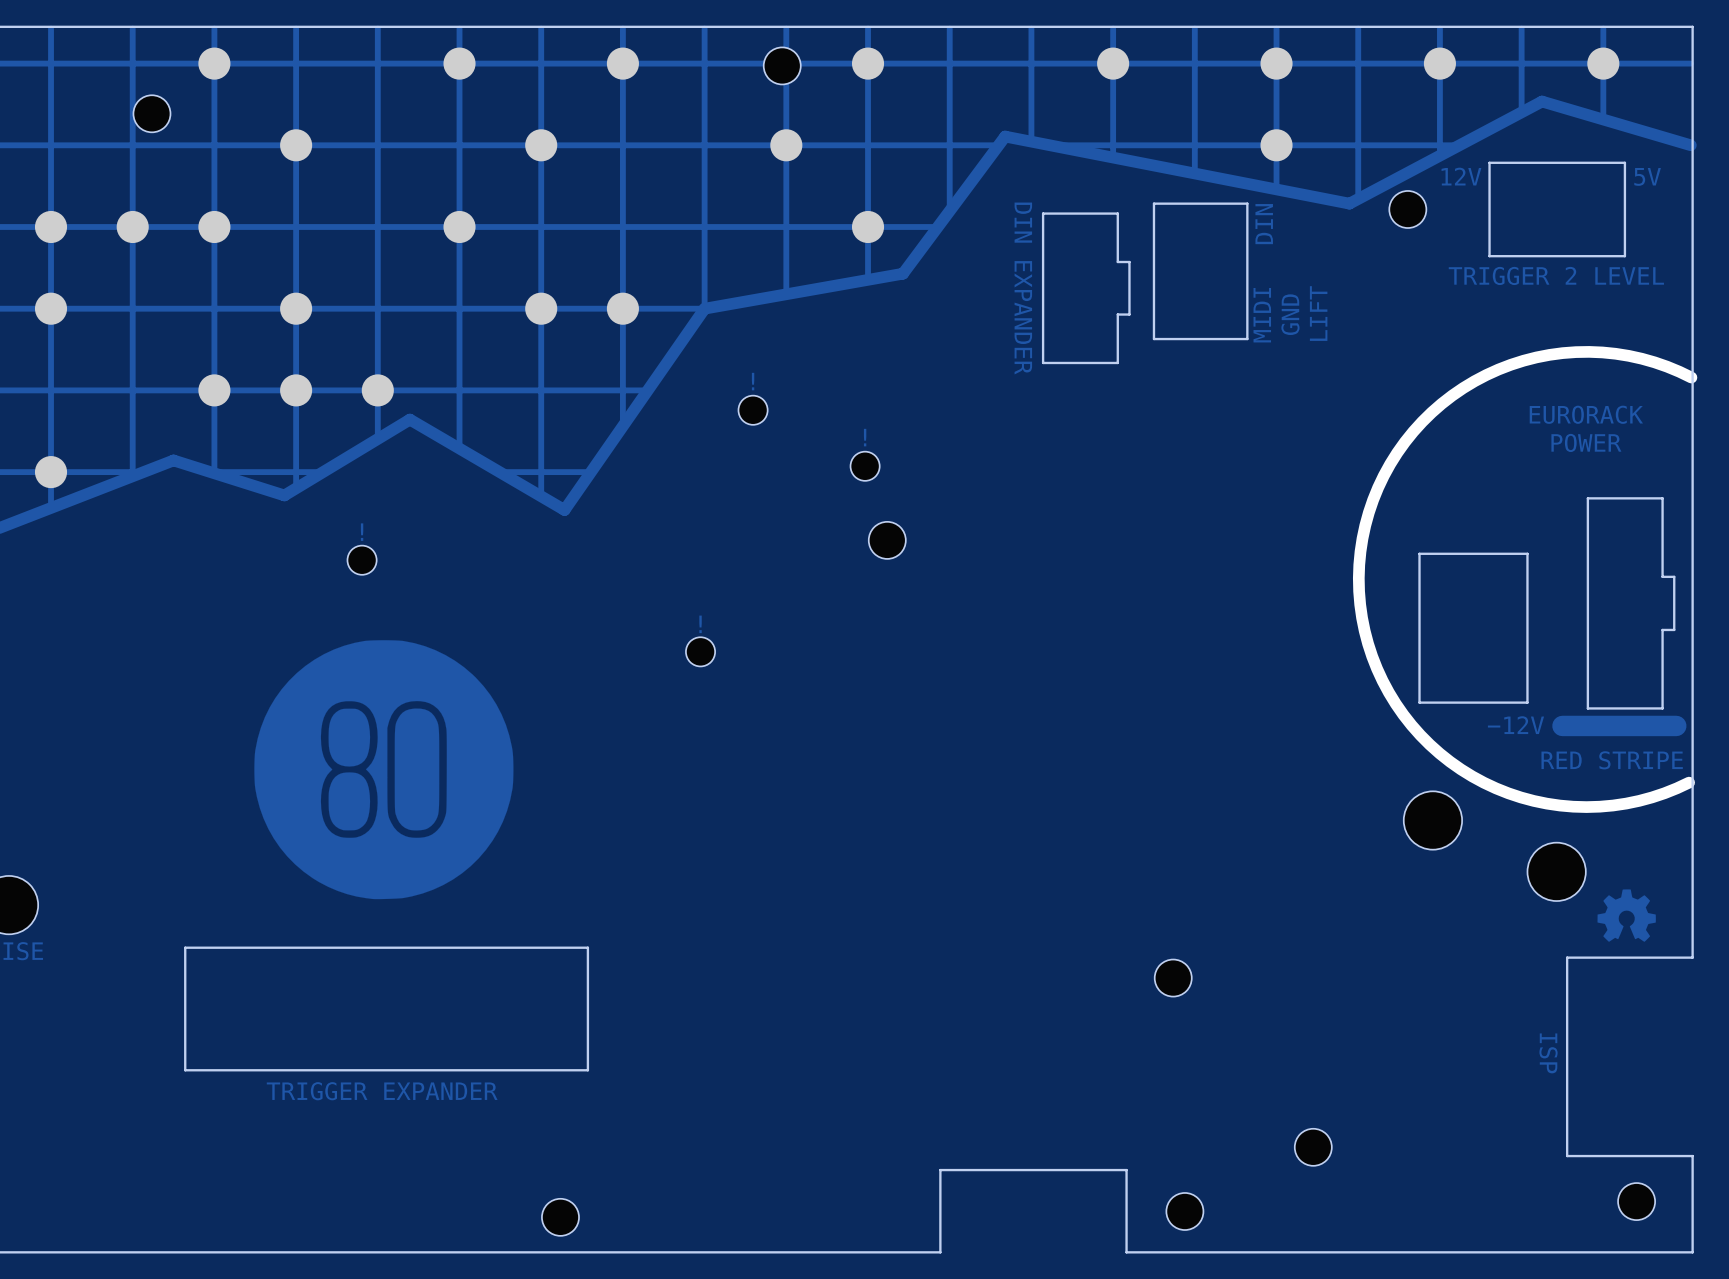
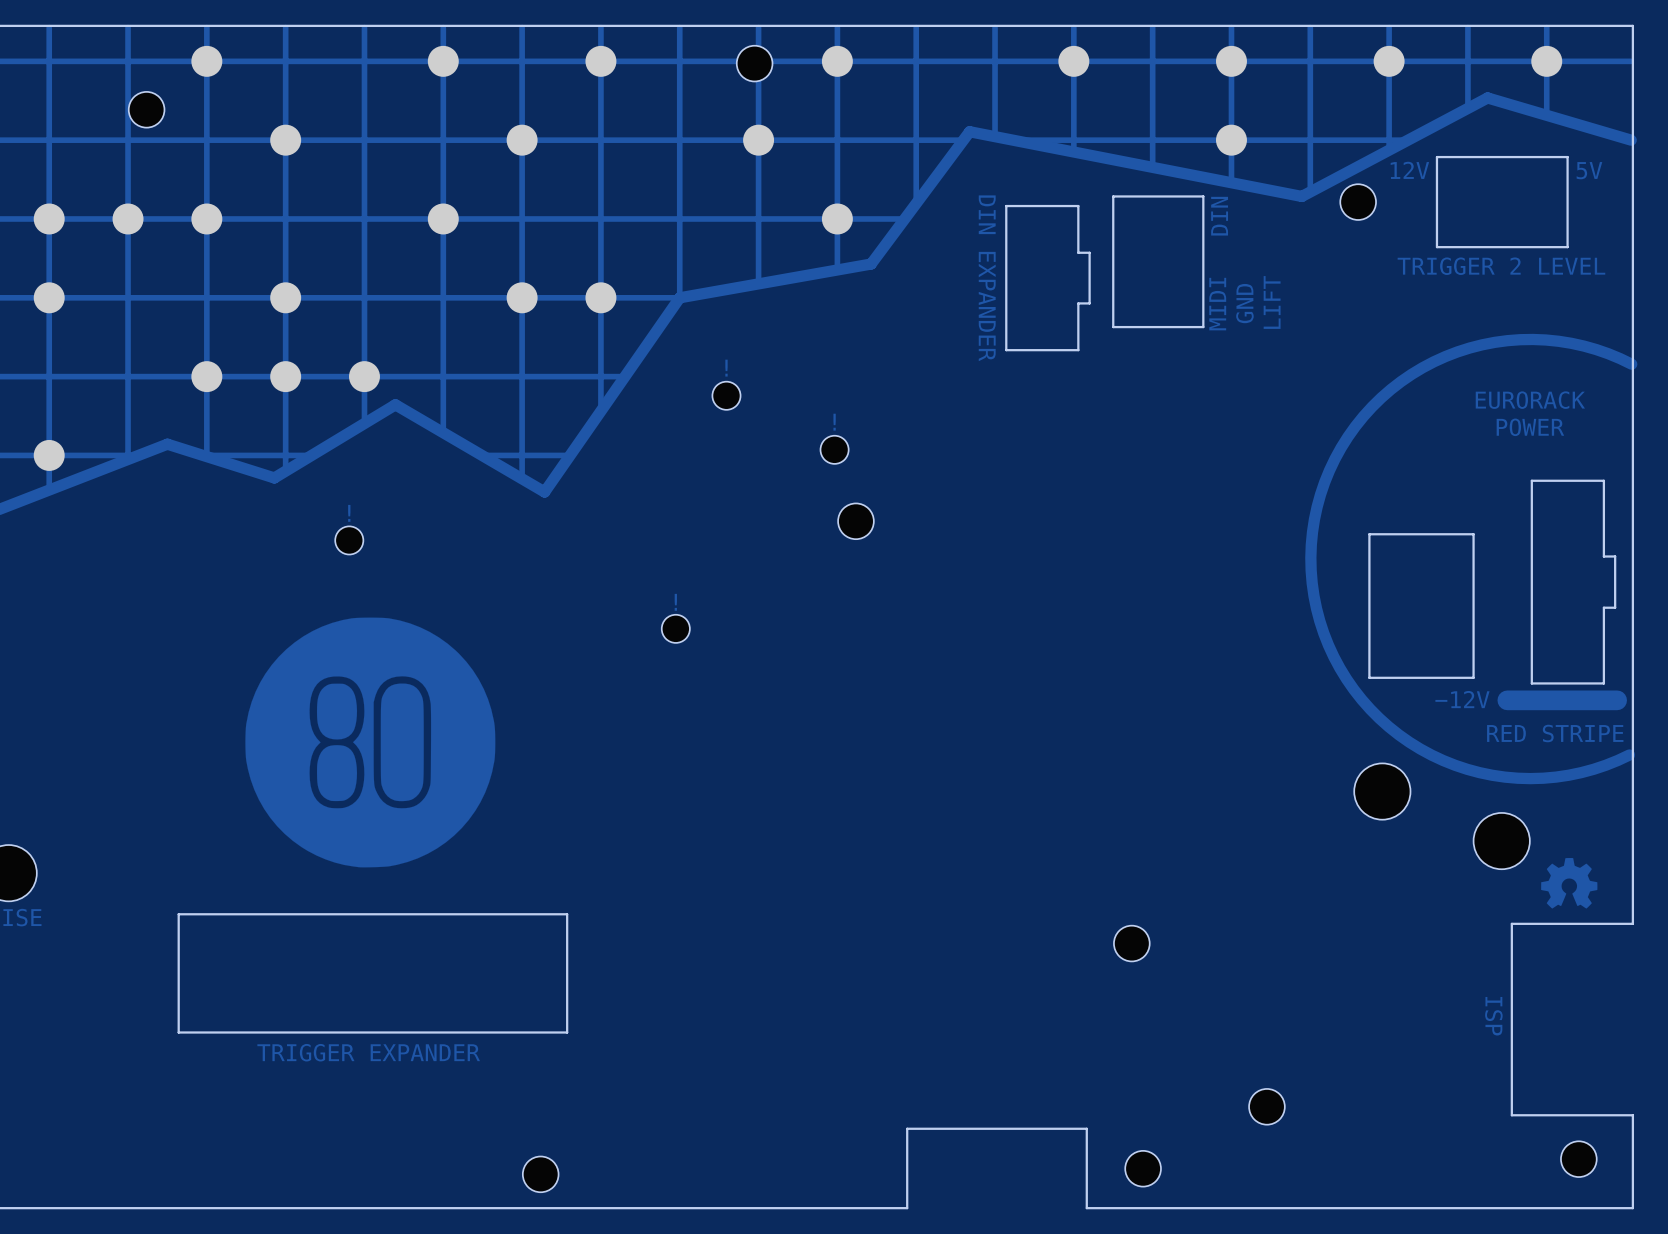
line: (1691, 377) (1667, 366) (1641, 358) (1615, 353) (1575, 352) (1549, 354) (1523, 360) (1498, 369) (1474, 381) (1441, 403) (1422, 421) (1405, 442) (1390, 464) (1373, 500) (1365, 525) (1360, 551) (1358, 578) (1360, 604) (1364, 630) (1372, 656) (1382, 680) (1395, 703) (1420, 735) (1439, 753) (1461, 769) (1484, 782) (1508, 793) (1546, 803) (1573, 806) (1599, 806) (1626, 803) (1652, 797) (1689, 782) -> none
track: none -> (1631, 364) (1583, 346) (1558, 341) (1520, 339) (1469, 347) (1422, 367) (1390, 389) (1372, 406) (1341, 447) (1324, 482) (1317, 506) (1310, 557) (1316, 608) (1333, 656) (1346, 679) (1370, 709) (1409, 742) (1455, 765) (1492, 775) (1517, 778) (1568, 775) (1593, 769) (1629, 754)

